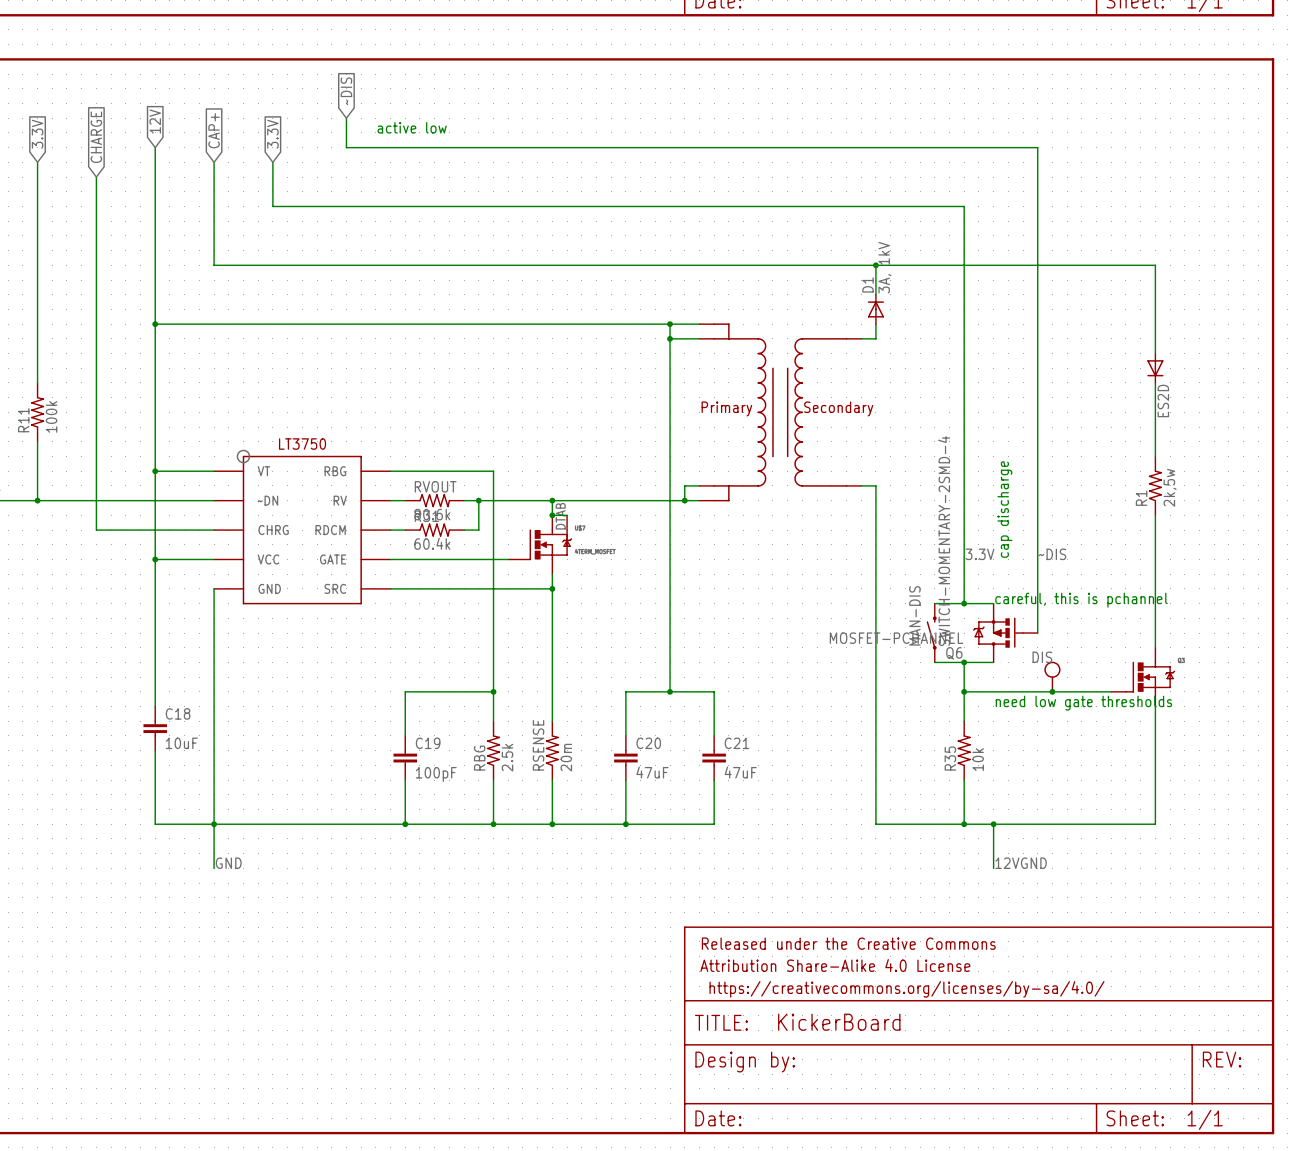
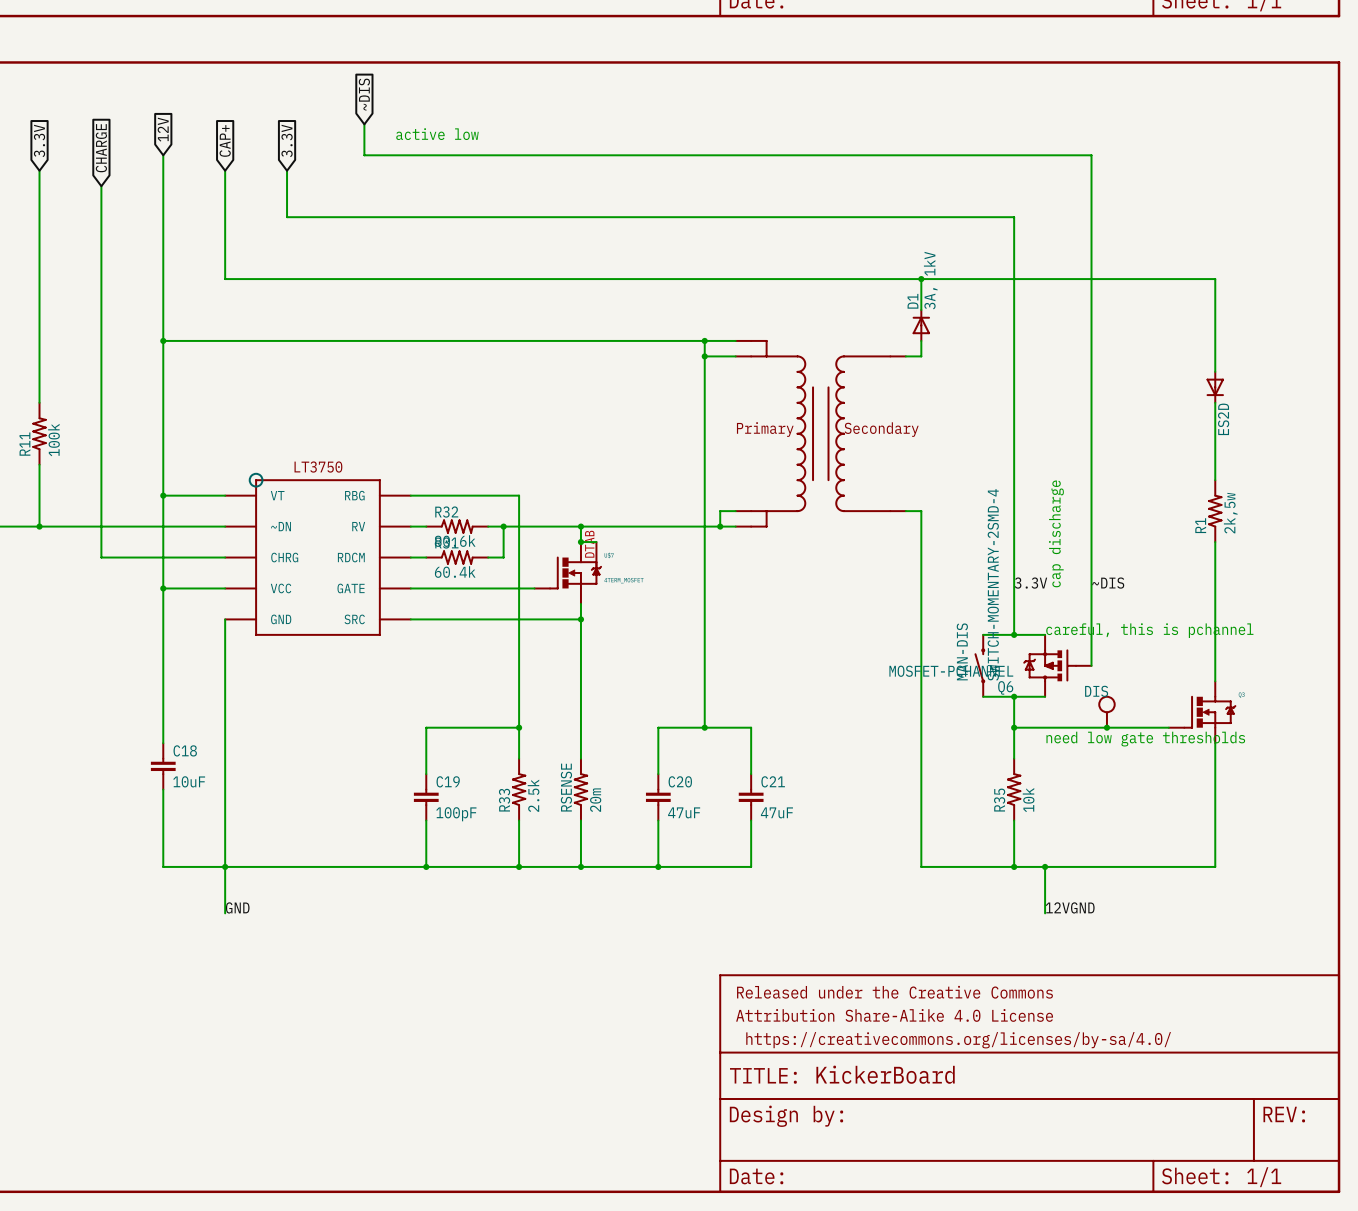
RVOUT name: RVOUT (435, 486) -> R32 (446, 512)
RBG name: RBG (479, 758) -> R33 (504, 800)

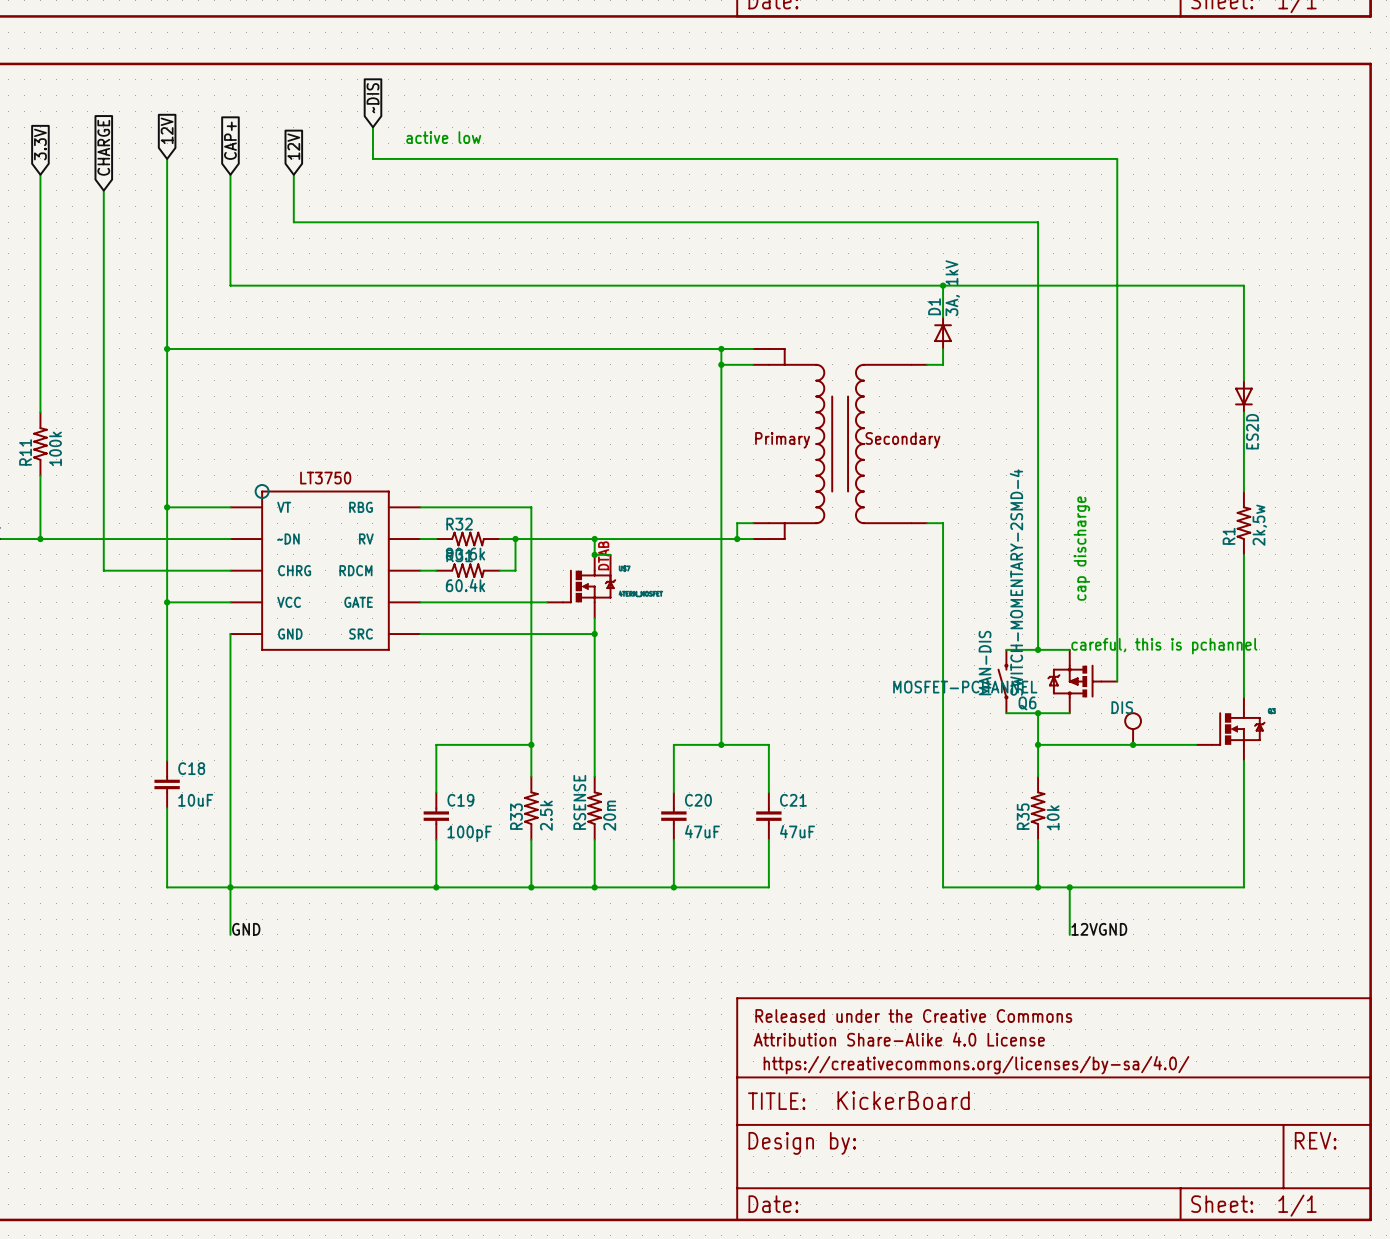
global label: 3.3V (287, 140) -> 12V (293, 146)
label: 3.3V (1030, 583) -> none
label: ~DIS (1108, 583) -> none
text: need low gate thresholds (1145, 739) -> none

